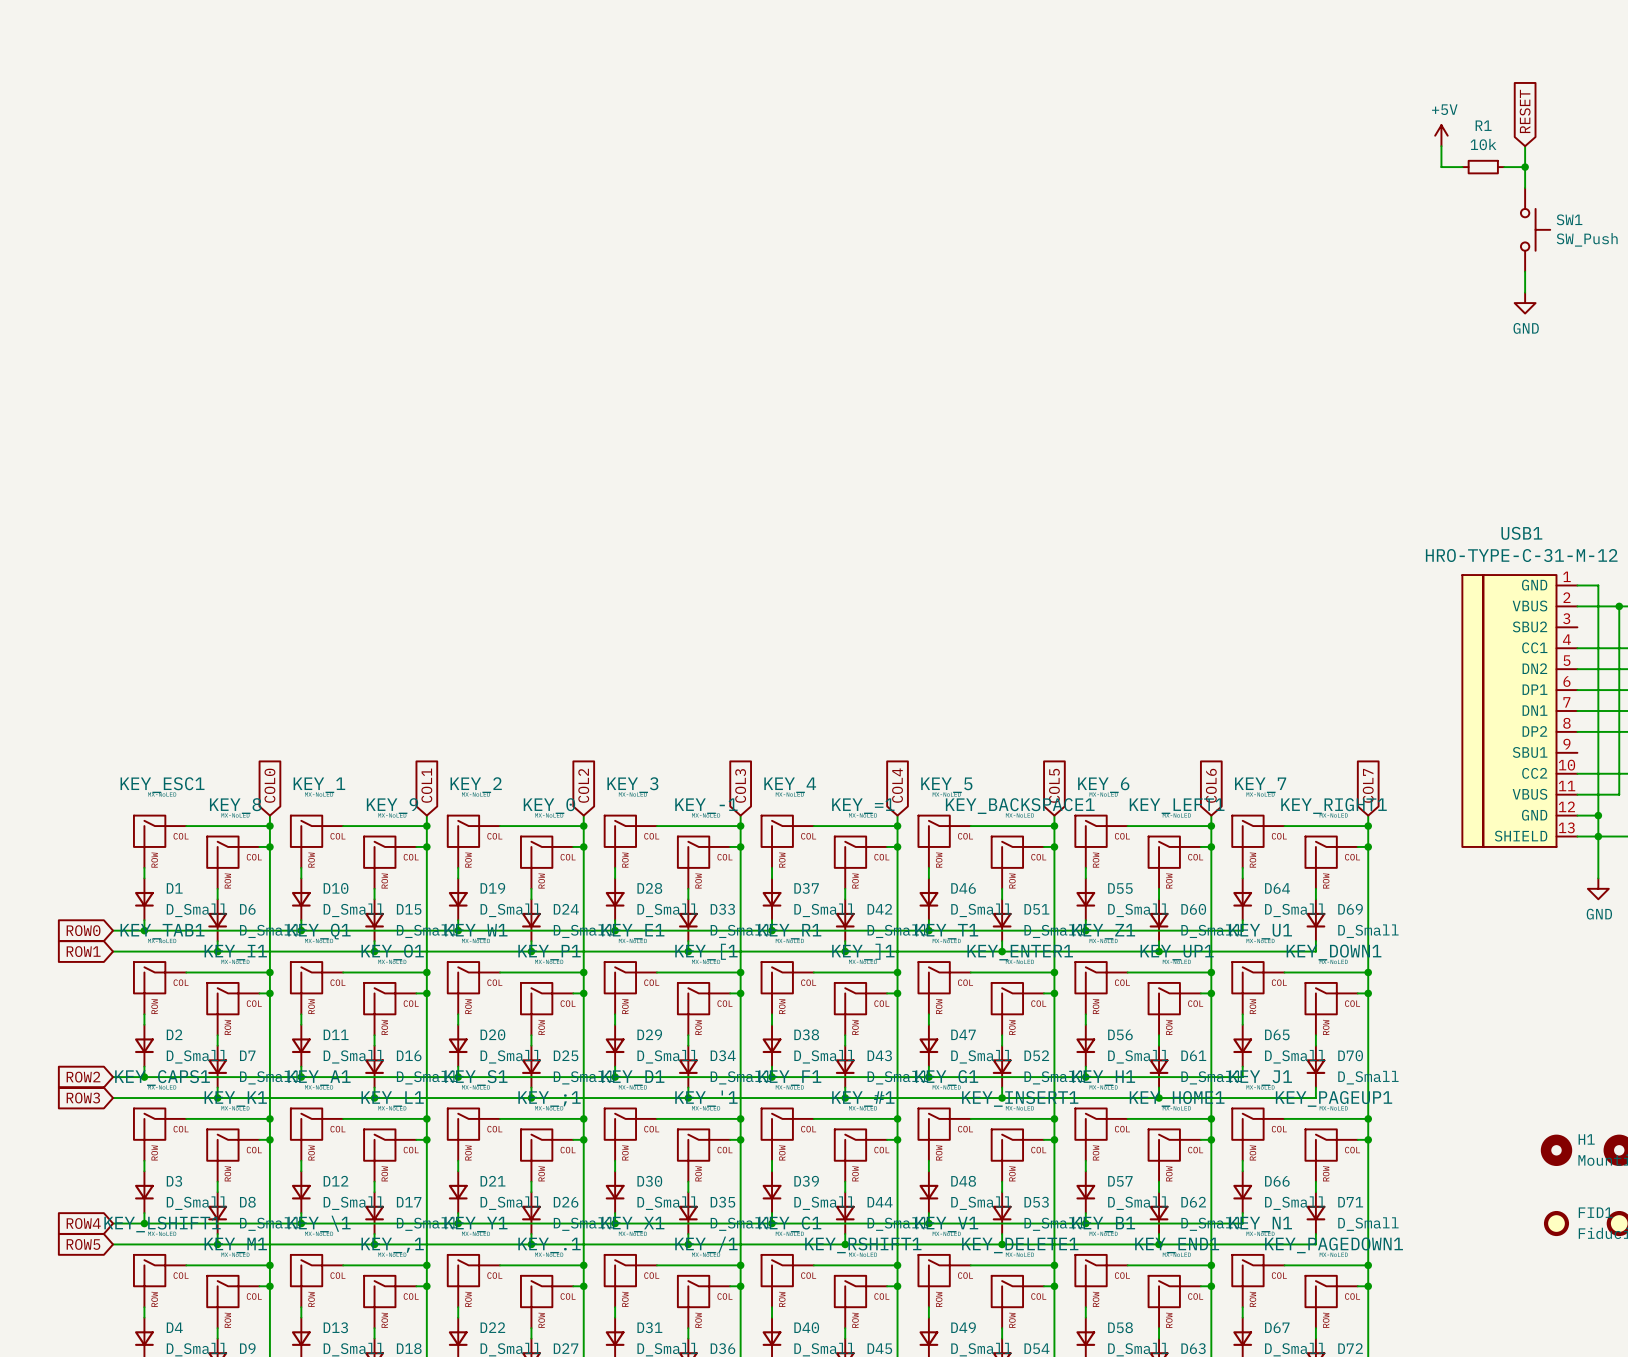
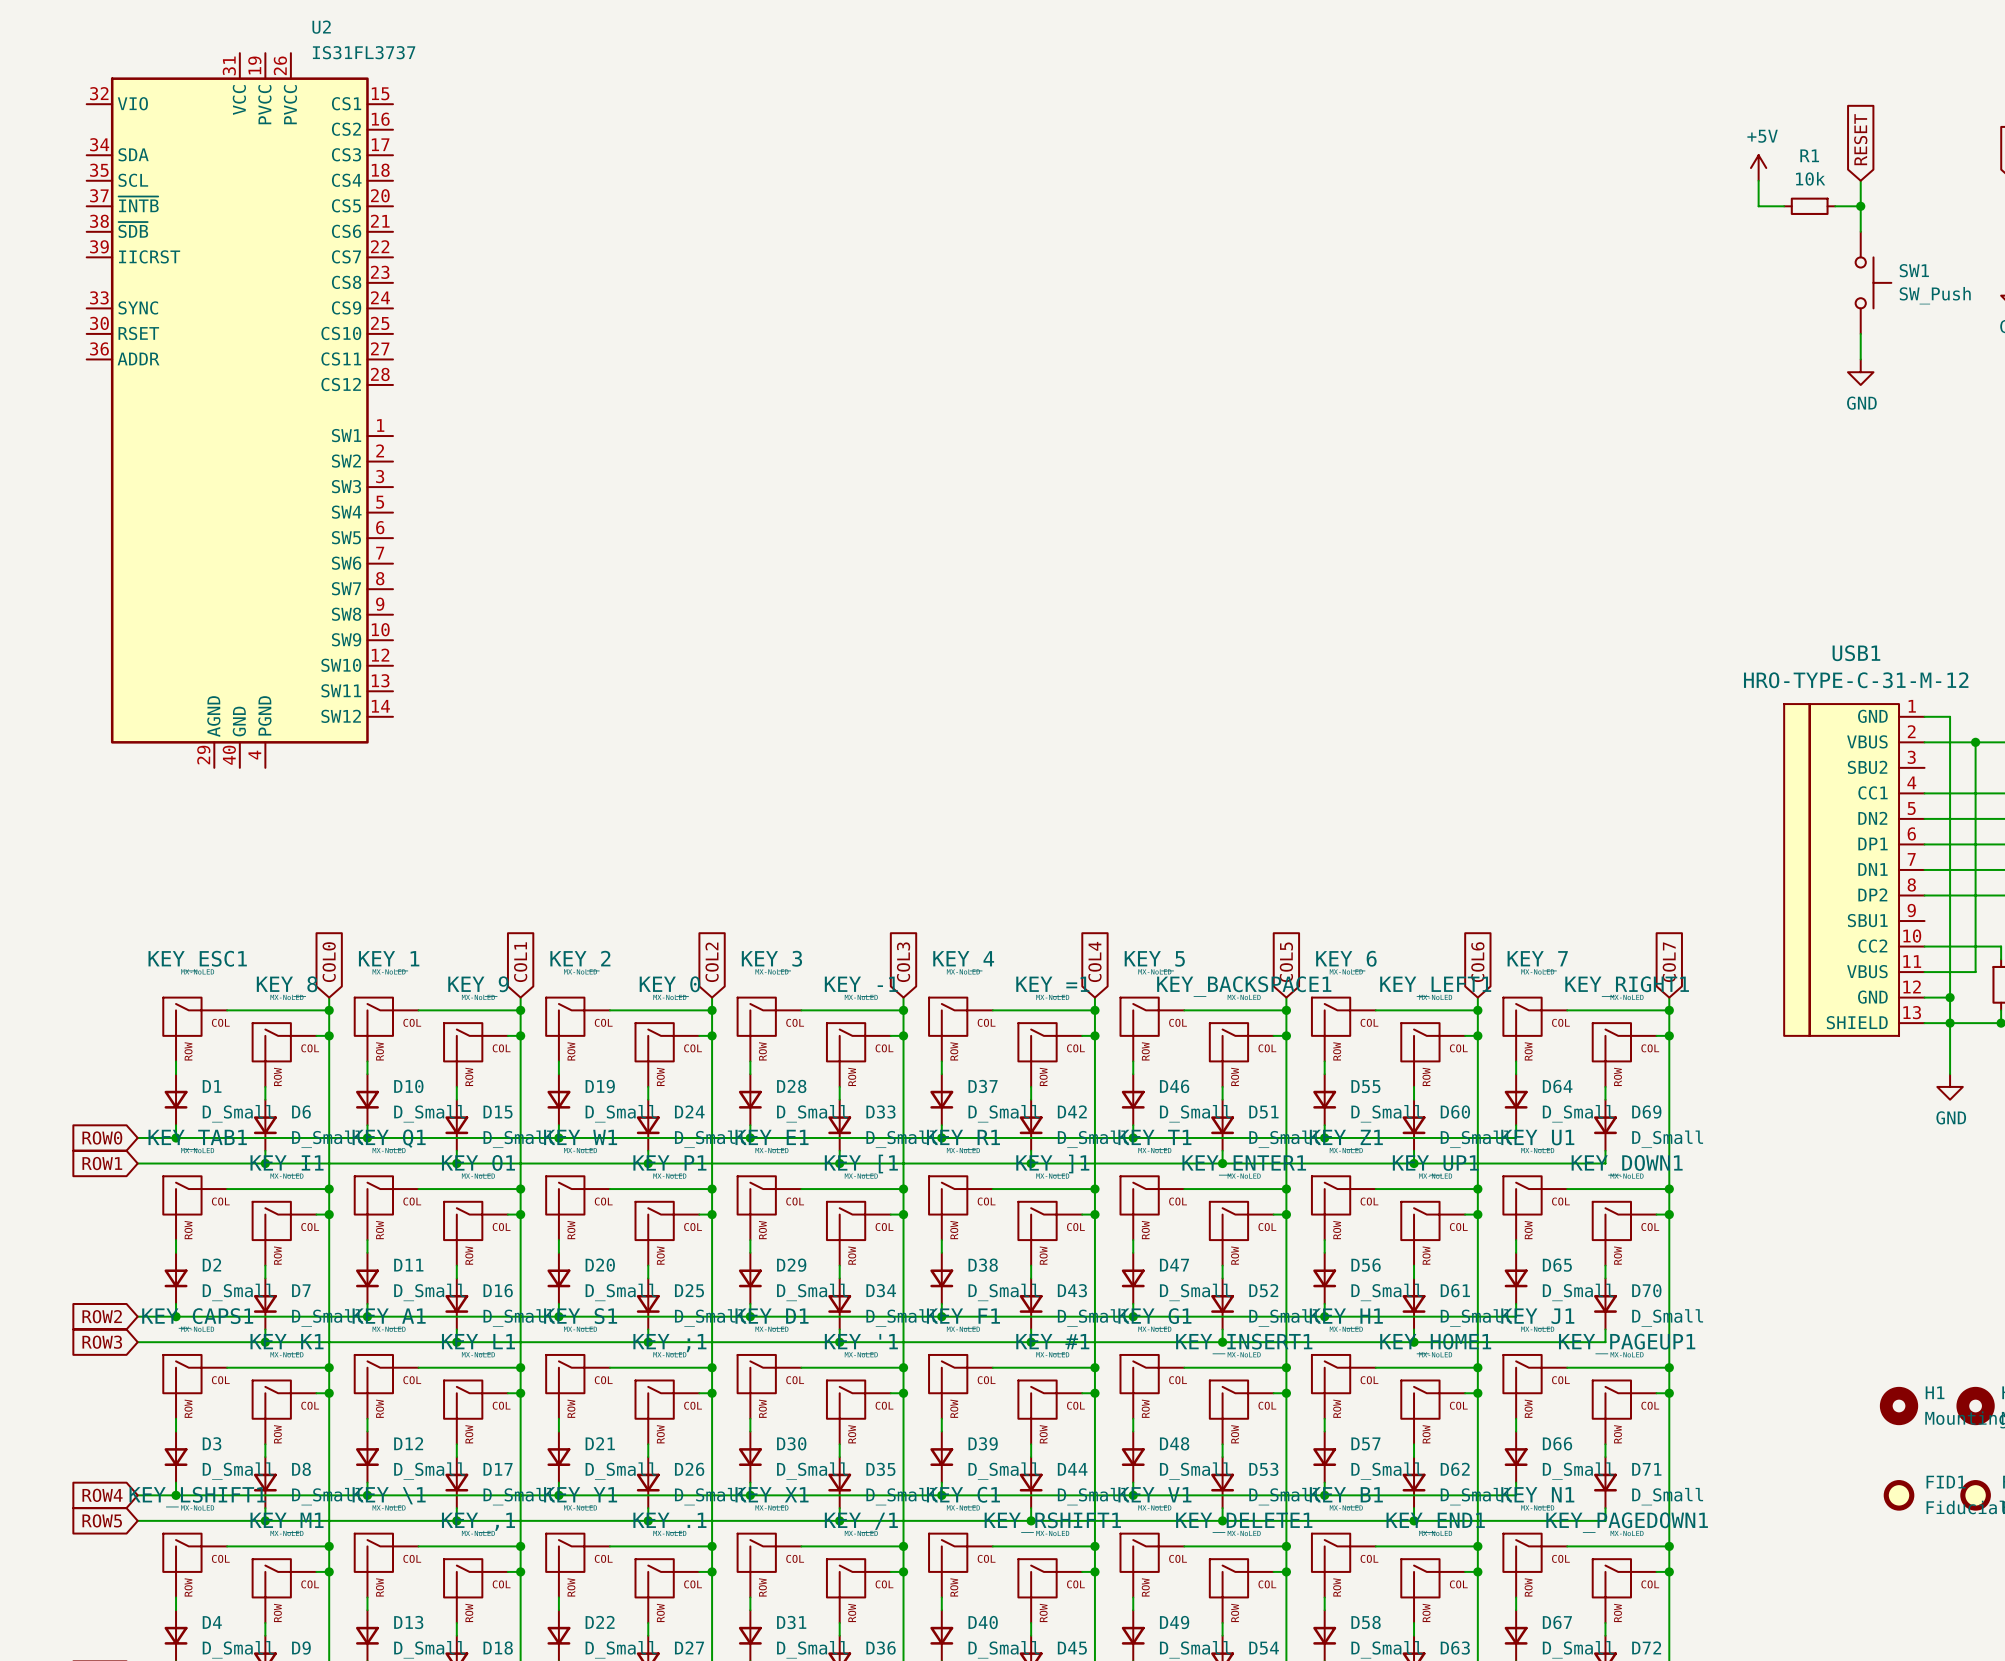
U2: none -> IS31FL3737 (239, 410)

